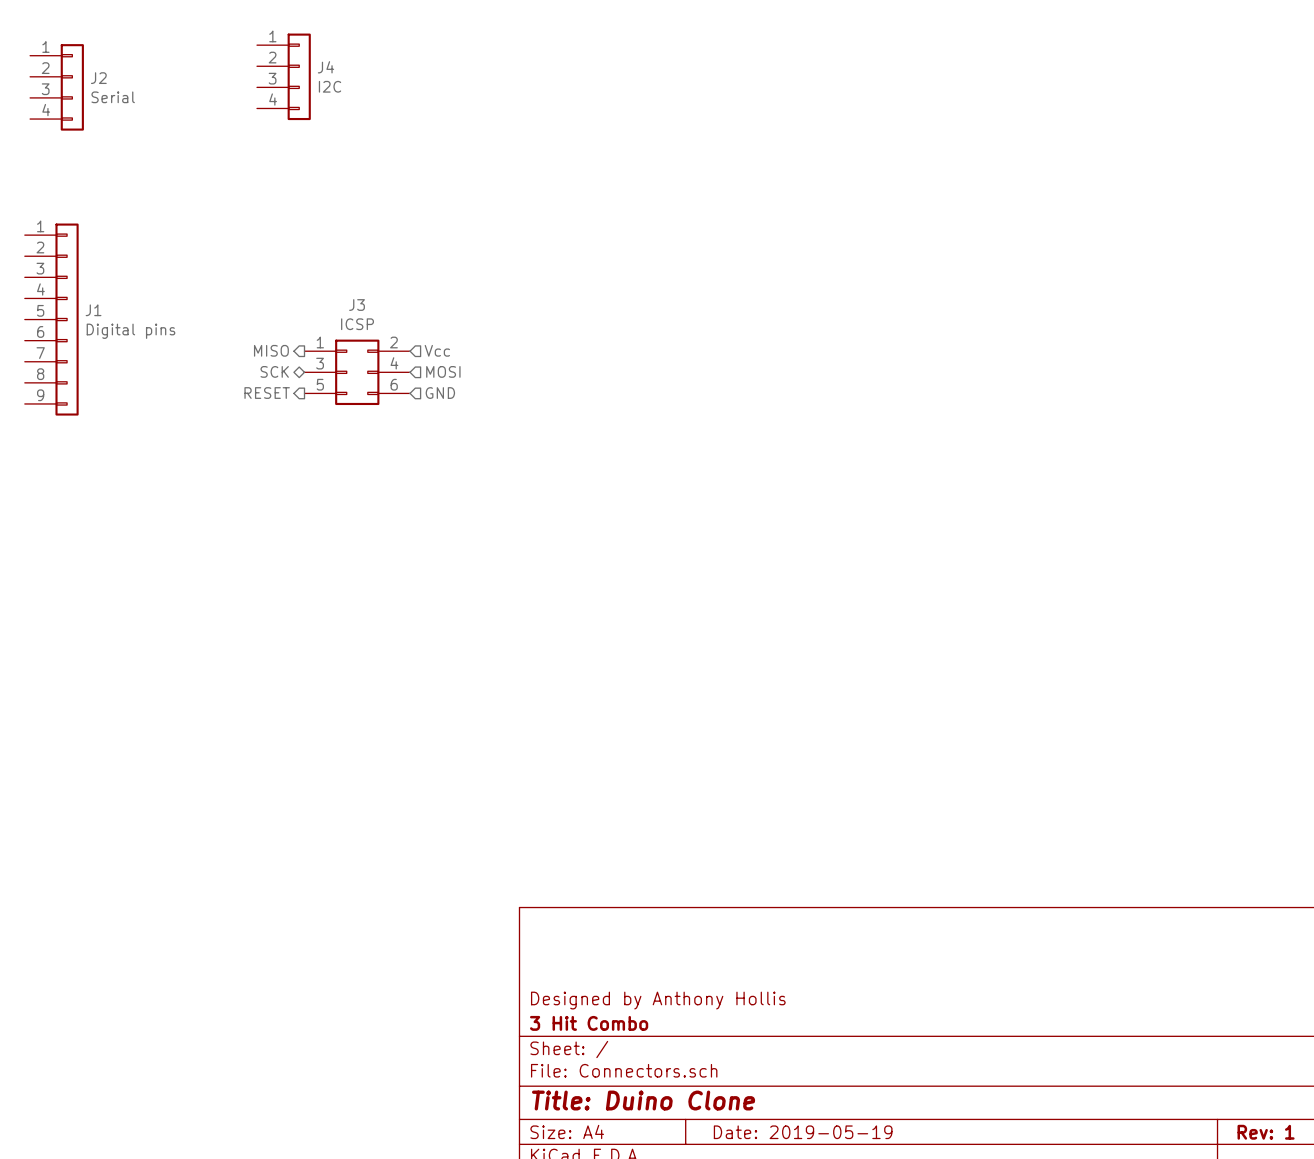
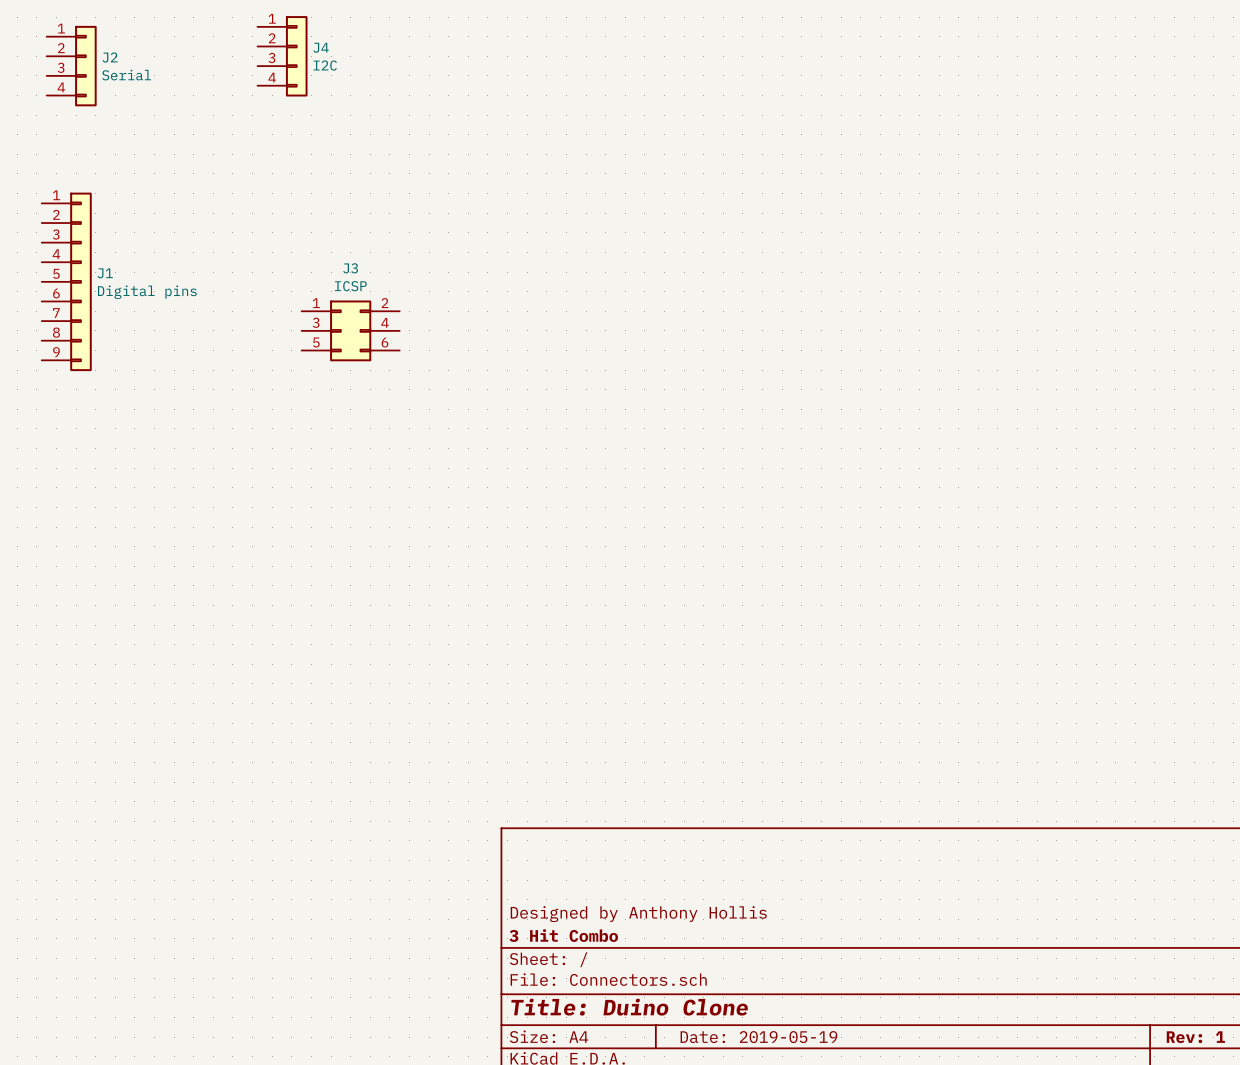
hierarchical label: MISO (271, 350) -> none
hierarchical label: Vcc (437, 350) -> none
hierarchical label: SCK (274, 371) -> none
hierarchical label: MOSI (443, 371) -> none
hierarchical label: RESET (267, 393) -> none
hierarchical label: GND (440, 393) -> none

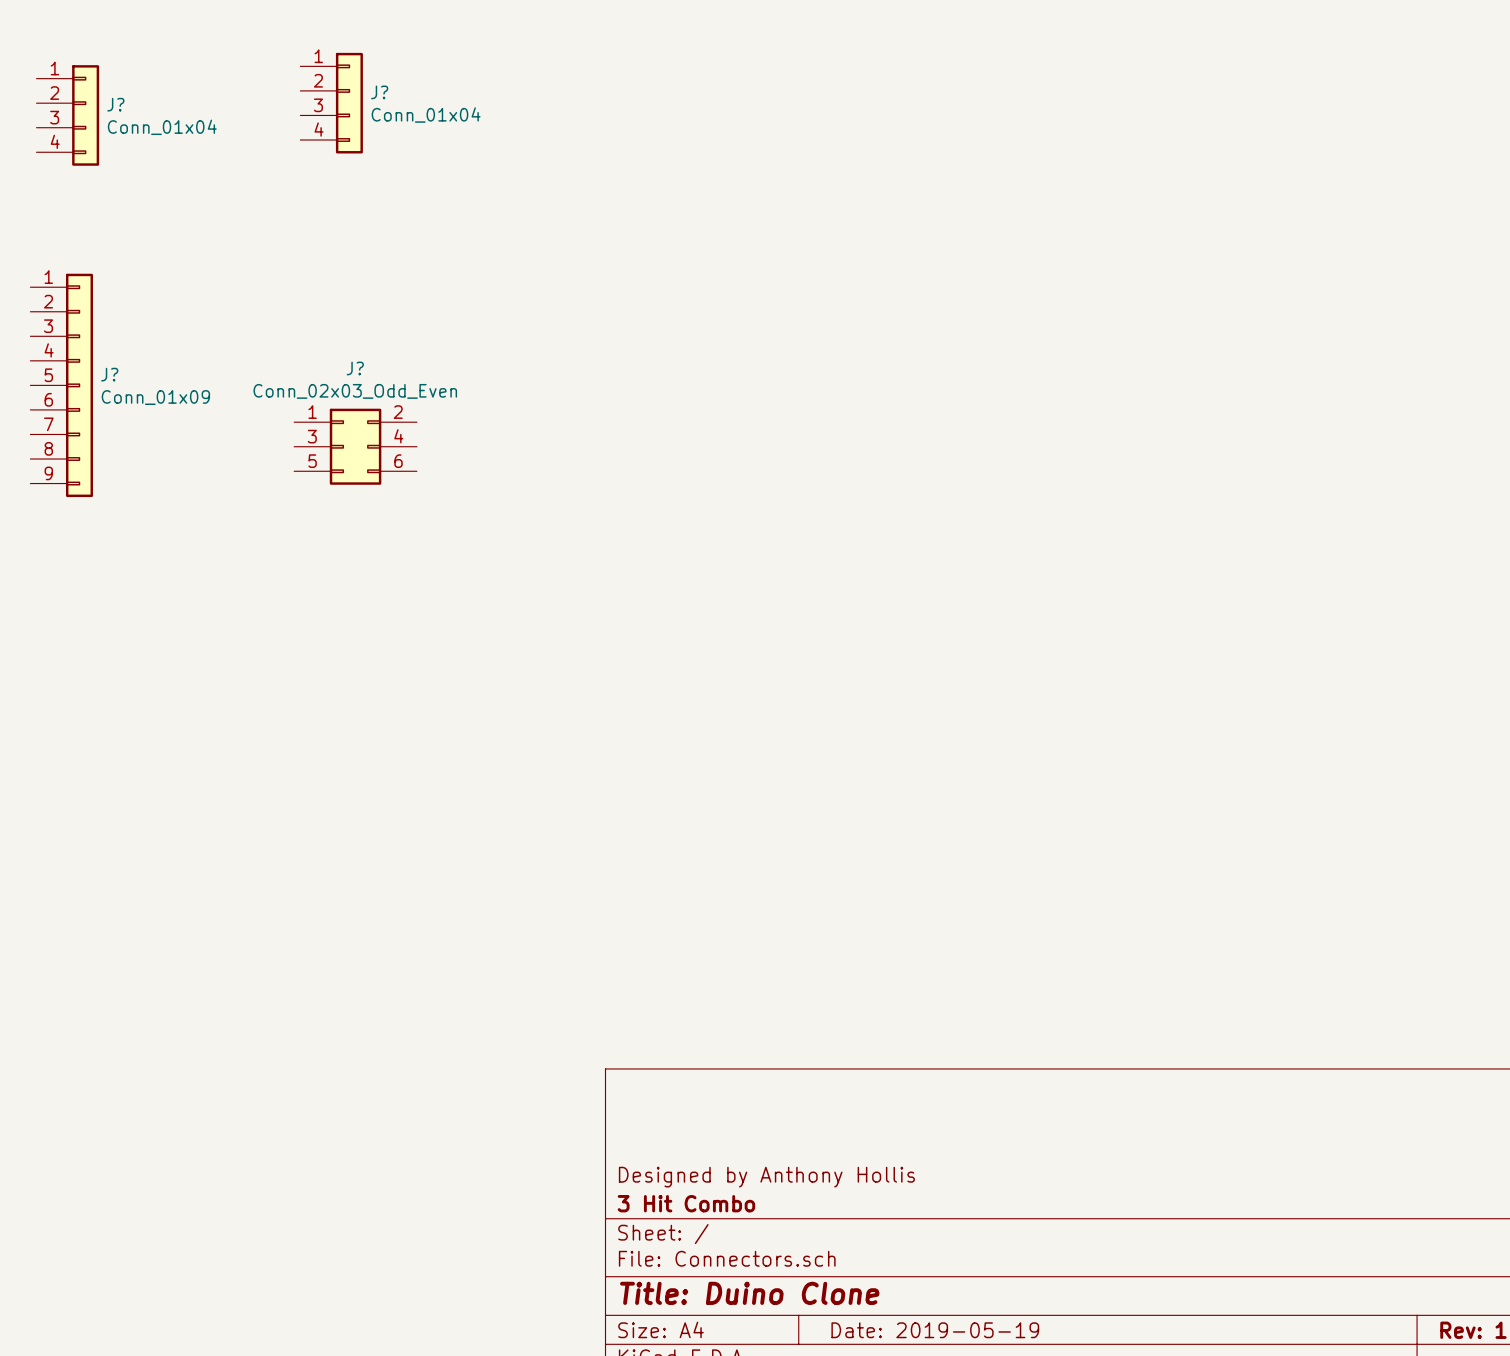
J4 name: J4 (321, 47) -> J? (379, 92)
J2 name: J2 (110, 57) -> J? (115, 104)
J4 value: I2C (325, 65) -> Conn_01x04 (426, 115)
J2 value: Serial (126, 75) -> Conn_01x04 (162, 127)
J1 name: J1 (105, 273) -> J? (109, 374)
J1 value: Digital pins (147, 292) -> Conn_01x09 (155, 397)
J?: none -> Conn_02x03_Odd_Even (355, 446)
J3: ICSP (350, 330) -> none

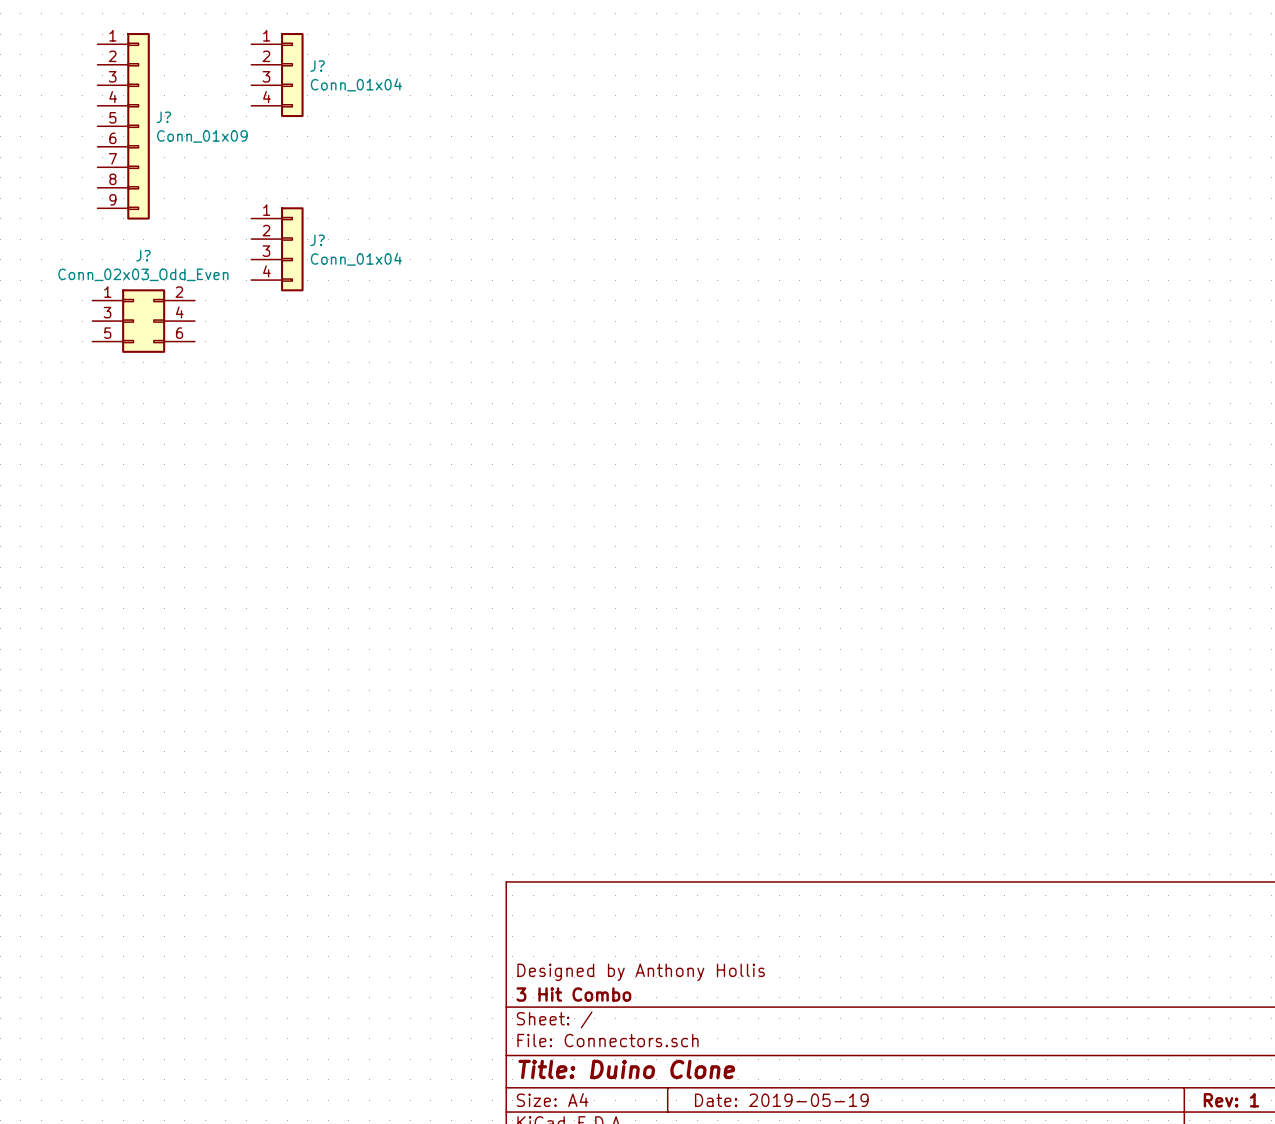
J?: Conn_01x04 (67, 115) -> none
J?: none -> Conn_01x04 (277, 249)
J? position: (61, 385) -> (123, 126)
J? position: (355, 446) -> (143, 321)

